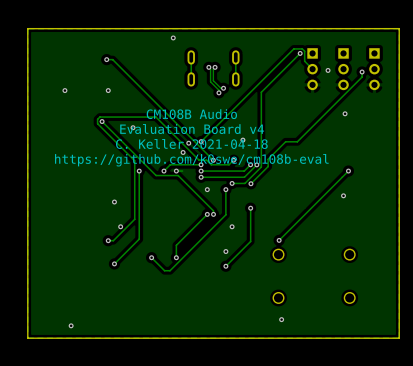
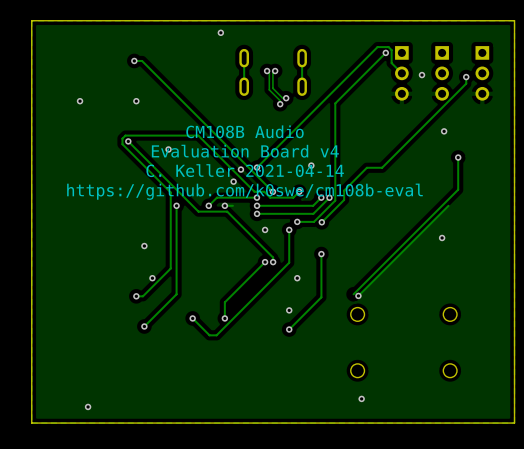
track: none -> (458, 157) (458, 189) (353, 294)
via: none -> (458, 157)
text: C. Keller 2021-04-18 (191, 143) -> C. Keller 2021-04-14 (245, 170)
via: (348, 171) -> none

